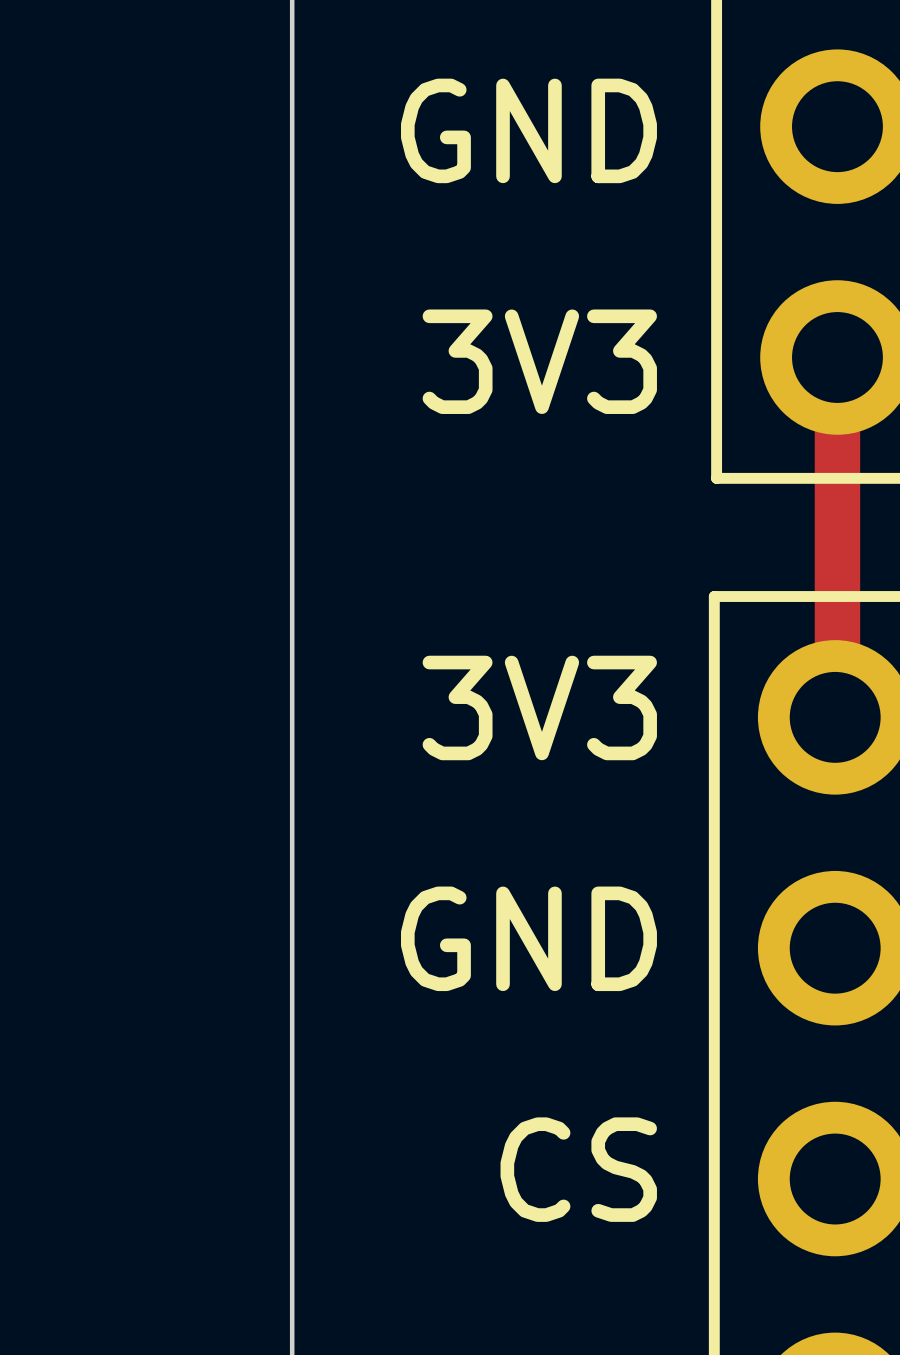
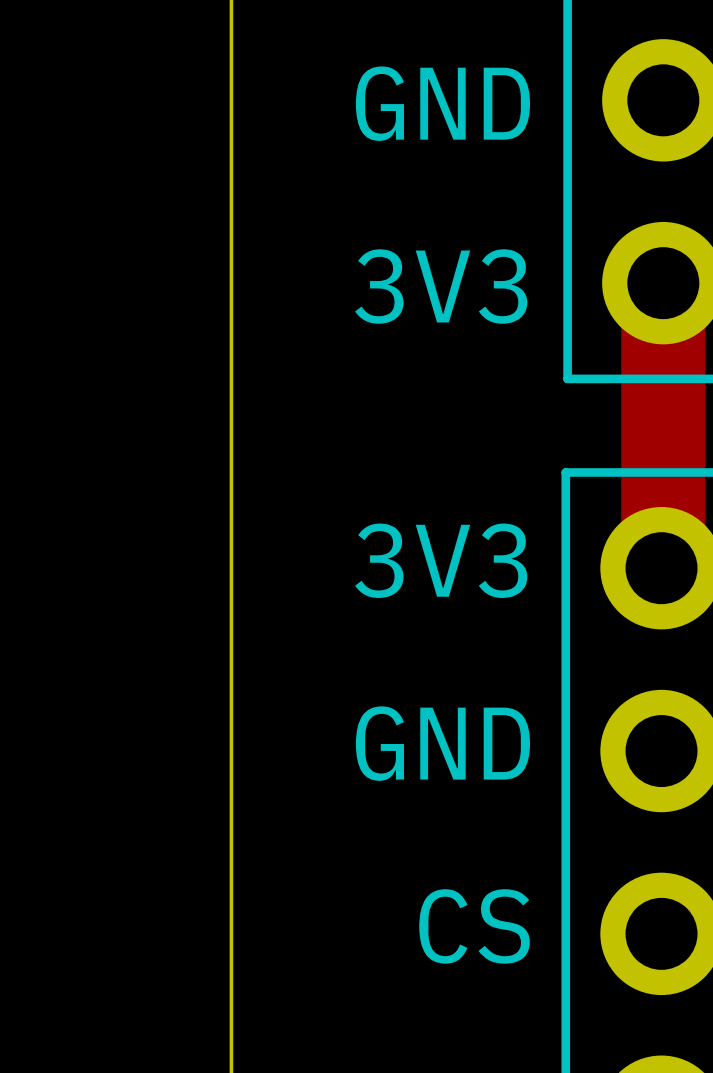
track width: thin (837, 357) (837, 715) (835, 717) -> thick (663, 283) (663, 566) (661, 568)

